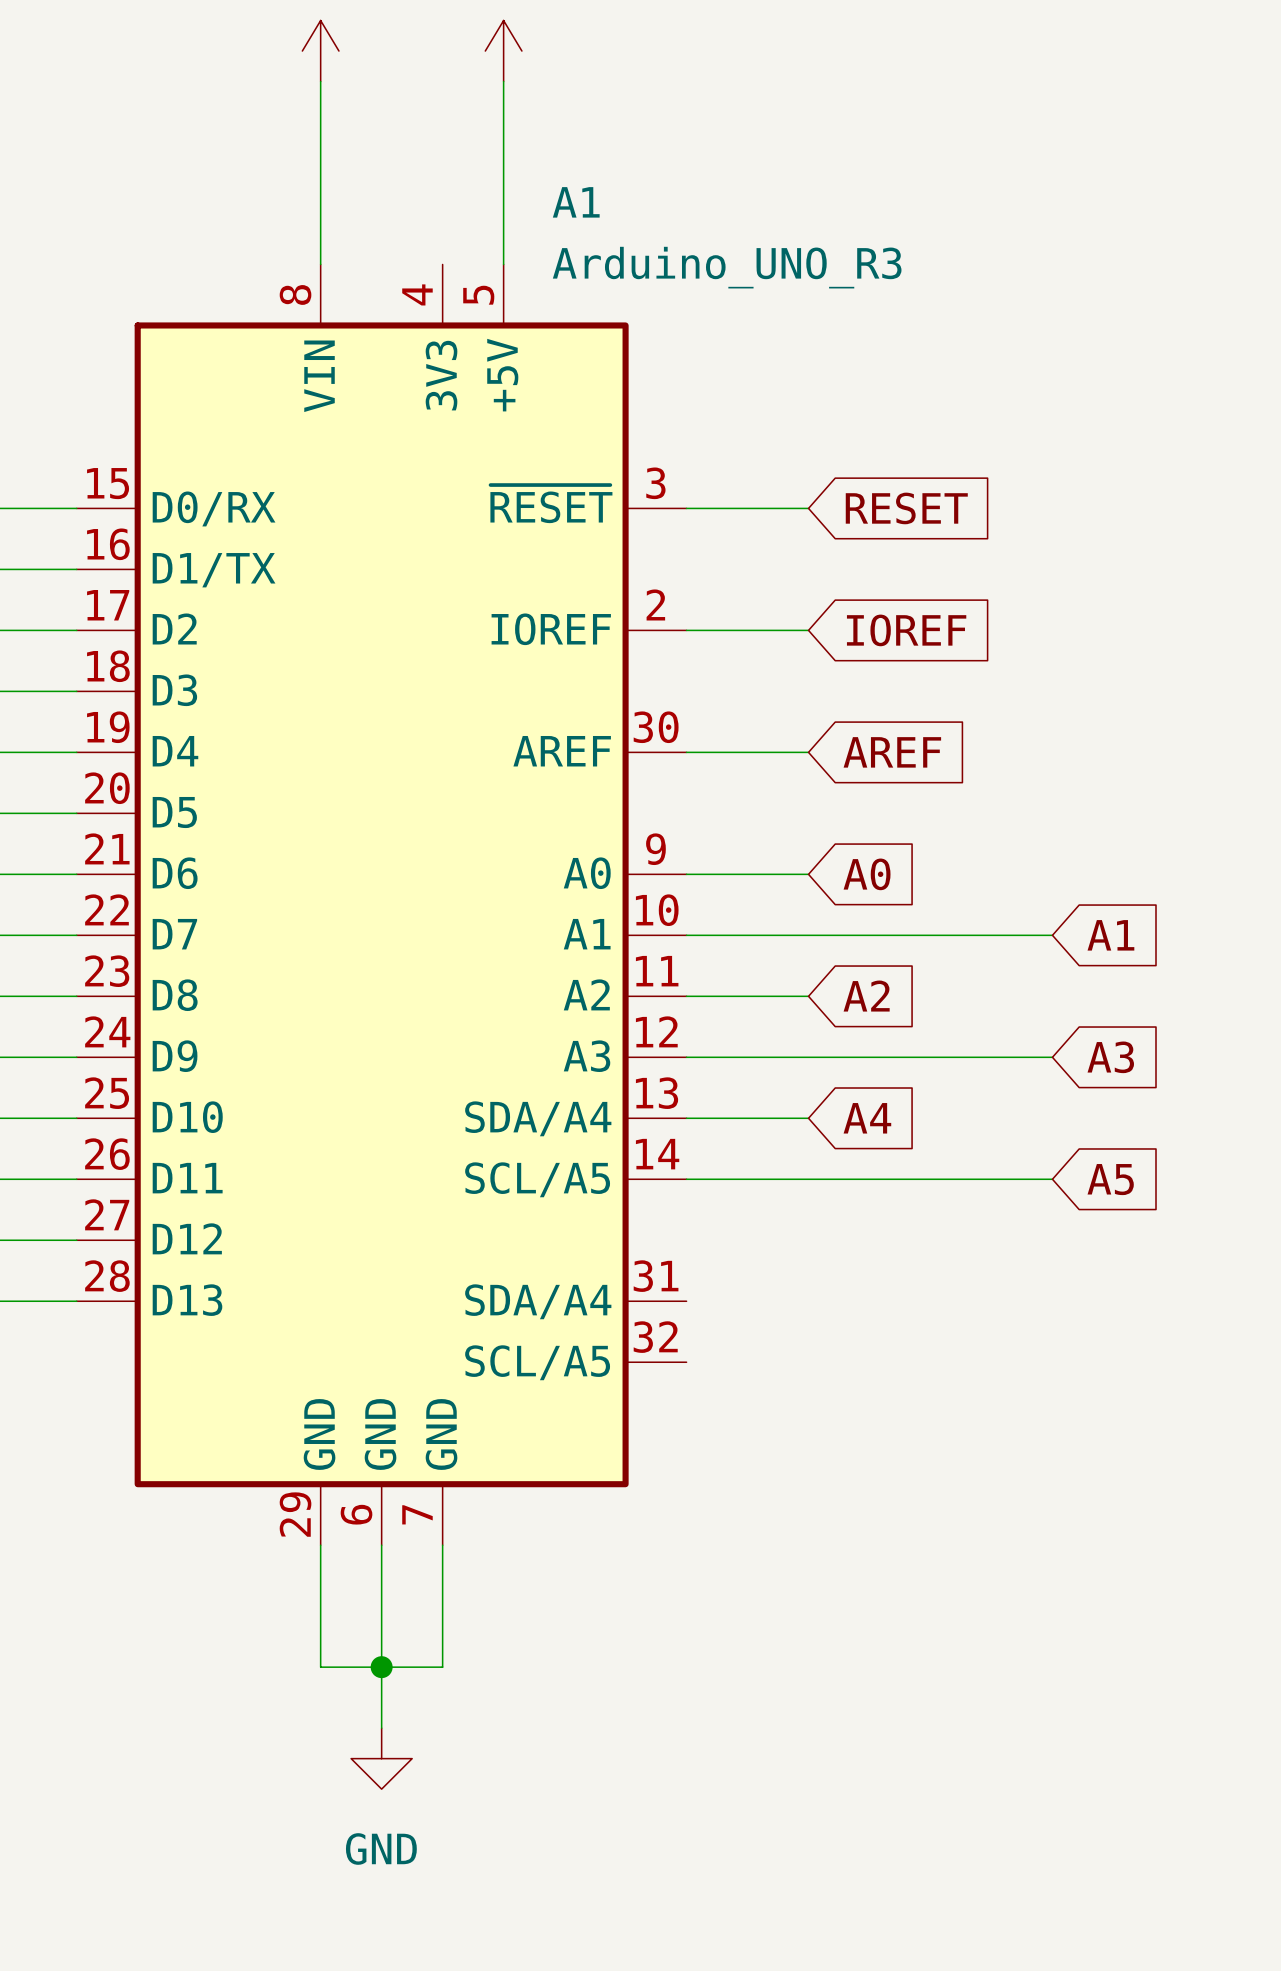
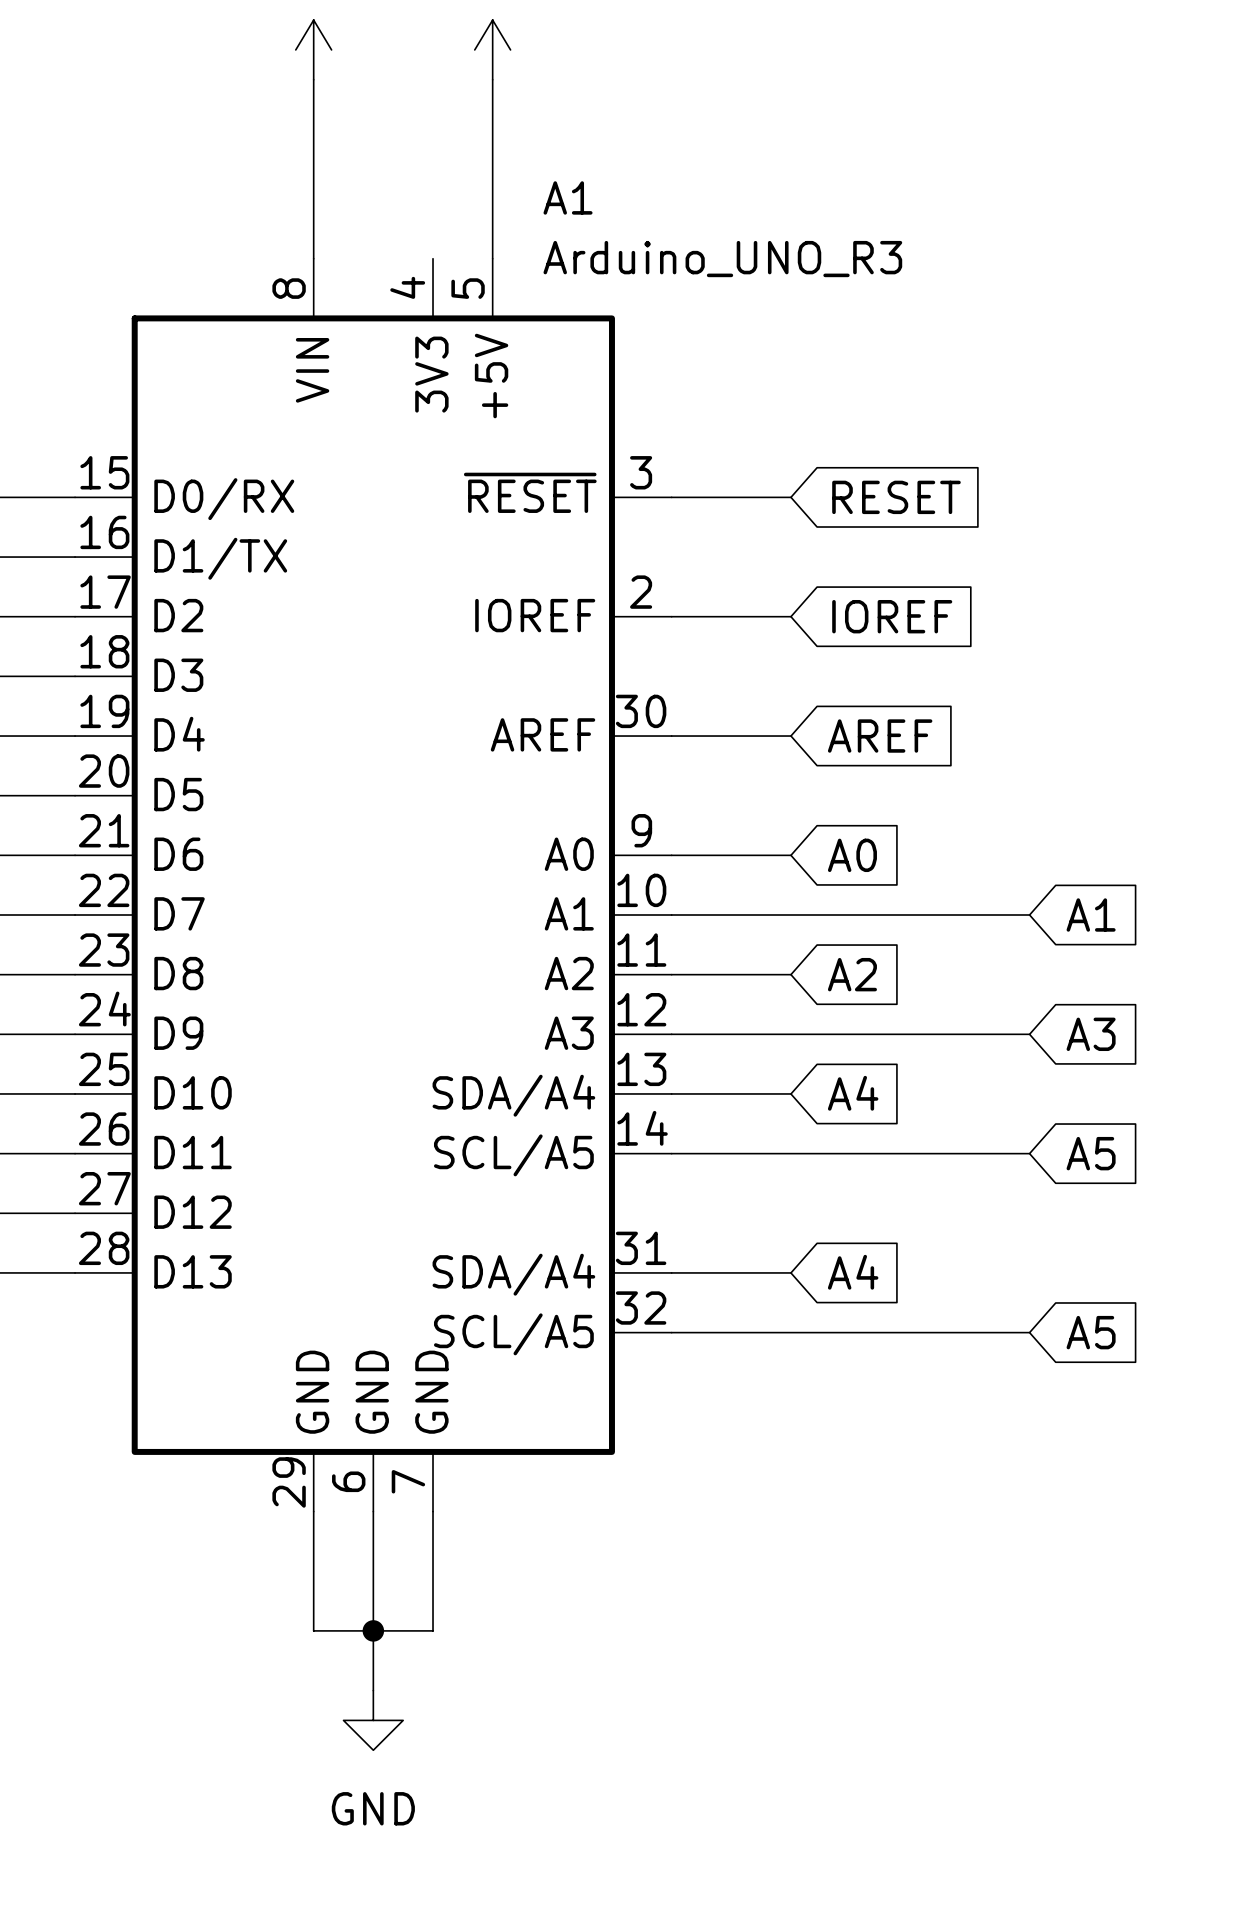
wire: none -> (671, 1272) (790, 1272)
global label: none -> A4 (853, 1272)
wire: none -> (671, 1332) (1029, 1332)
global label: none -> A5 (1091, 1332)

